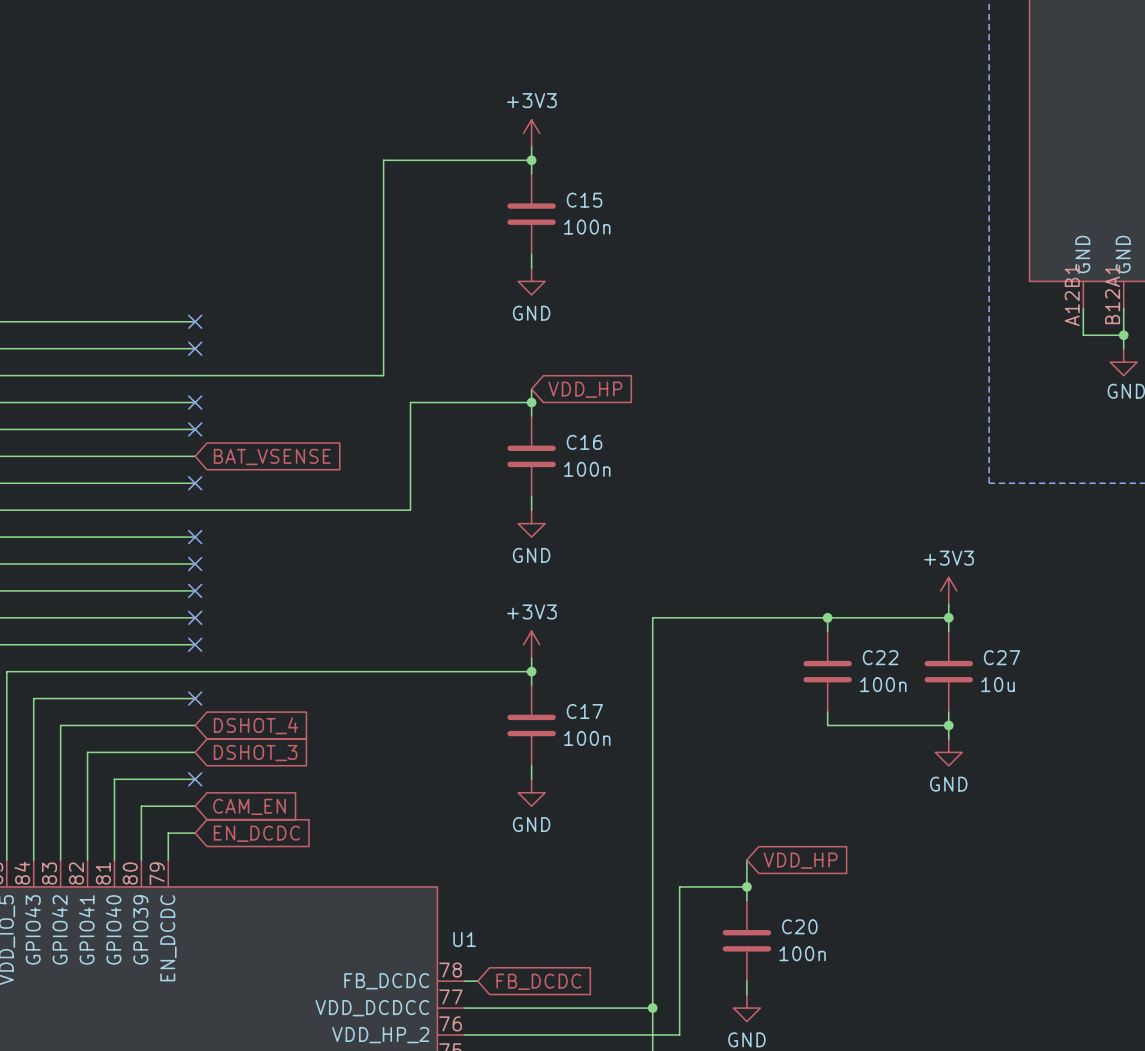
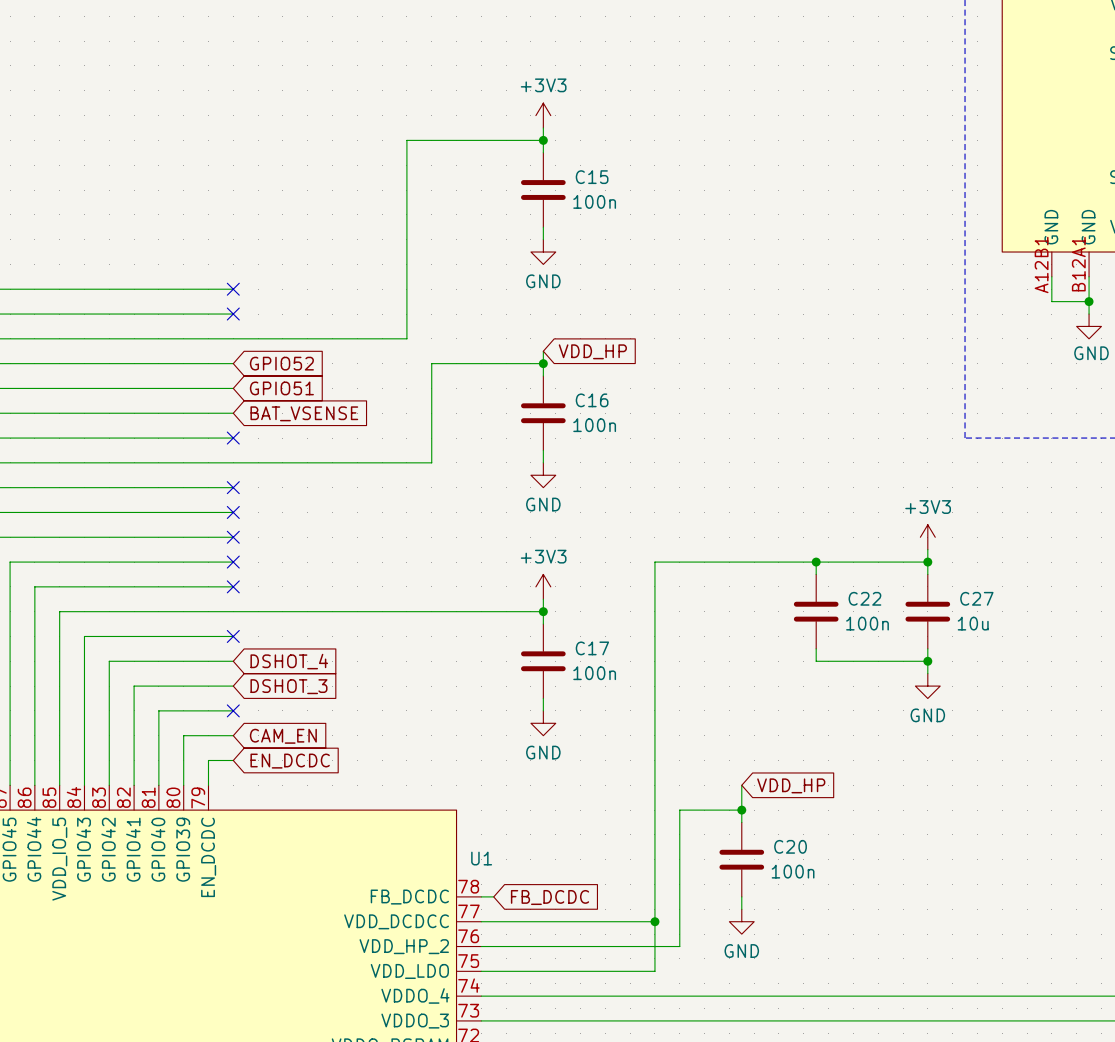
no-connect mark: (195, 402) -> none
global label: none -> GPIO52 (281, 363)
no-connect mark: (195, 429) -> none
global label: none -> GPIO51 (281, 388)

